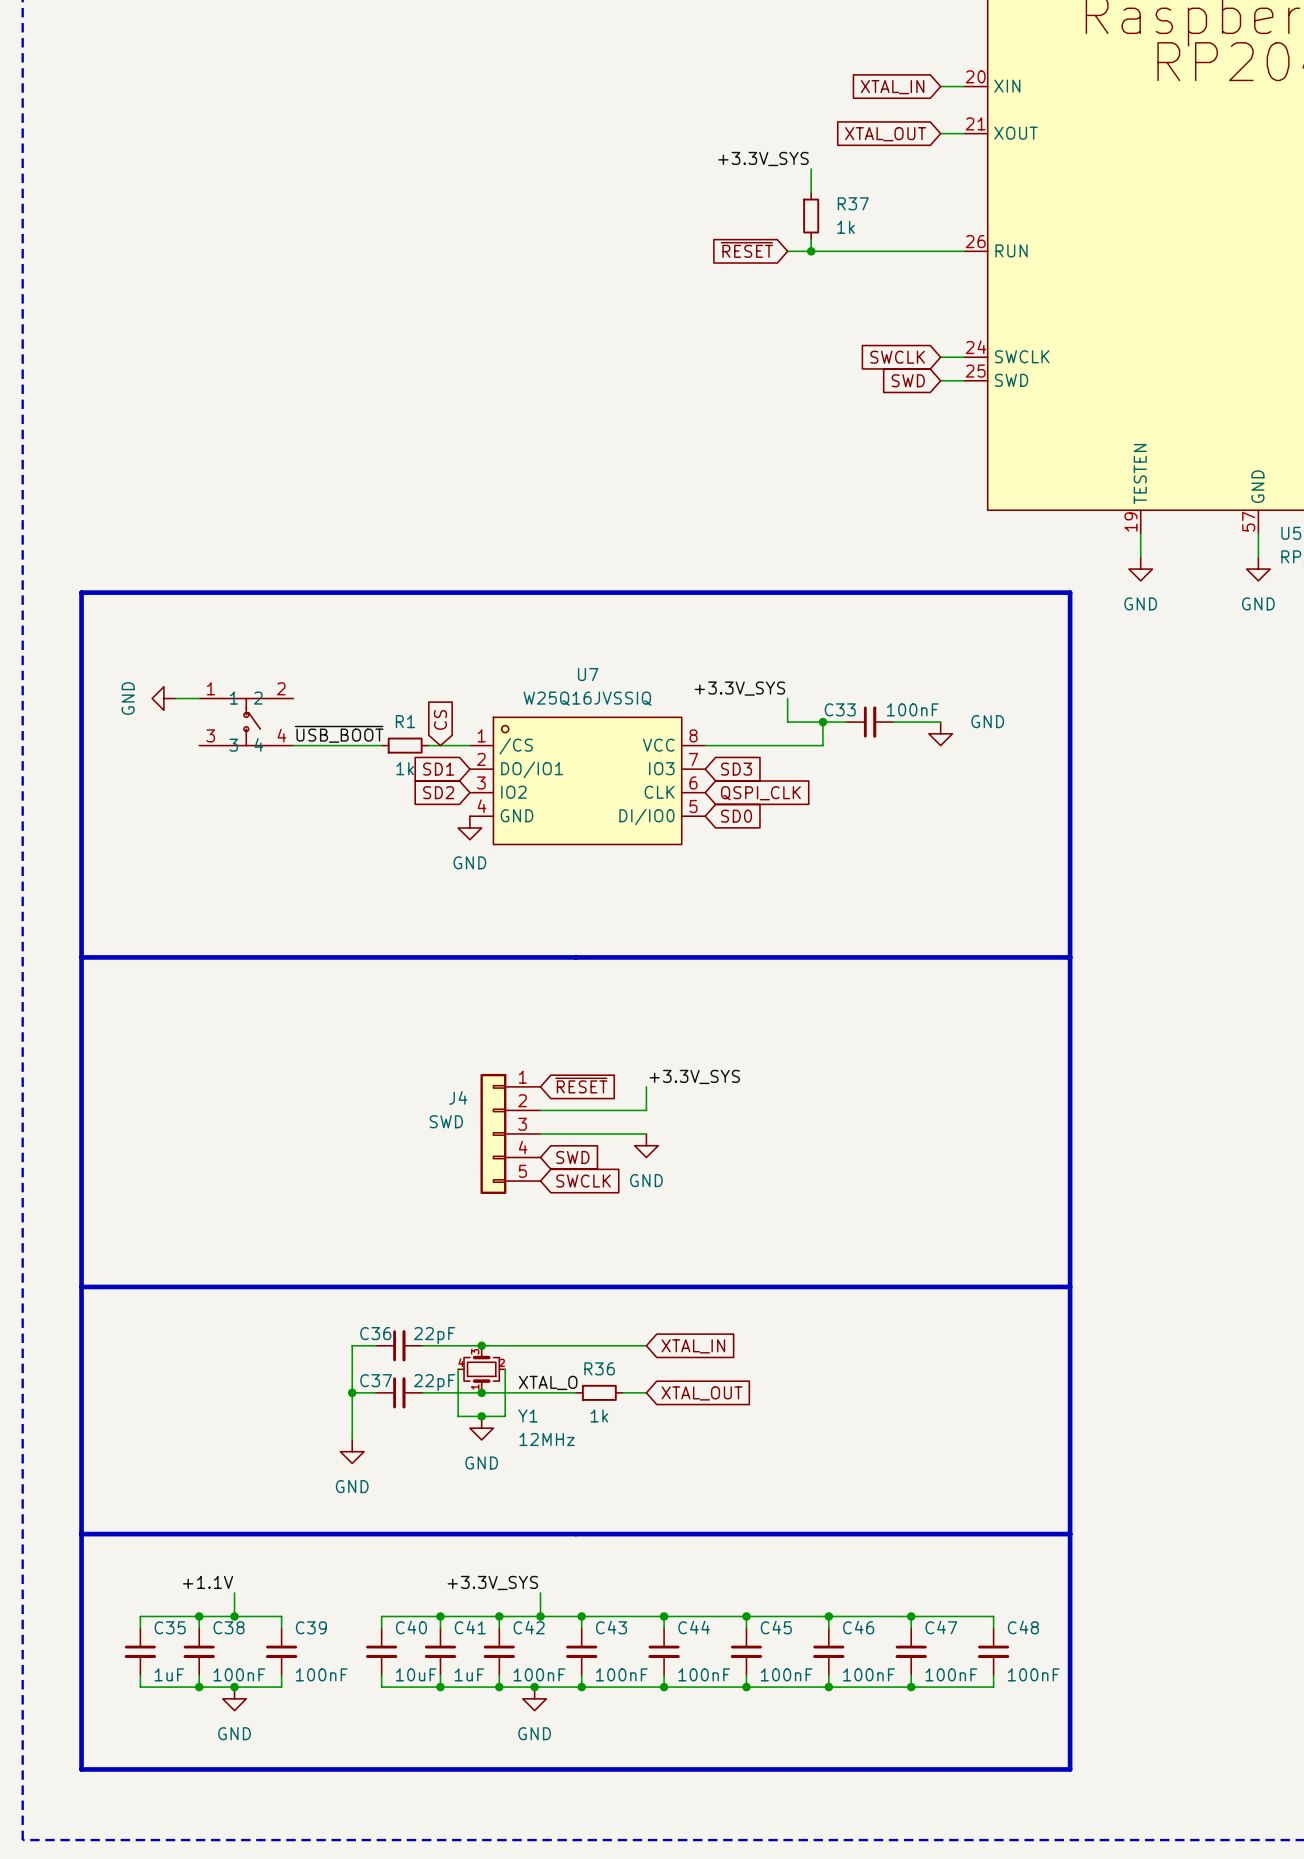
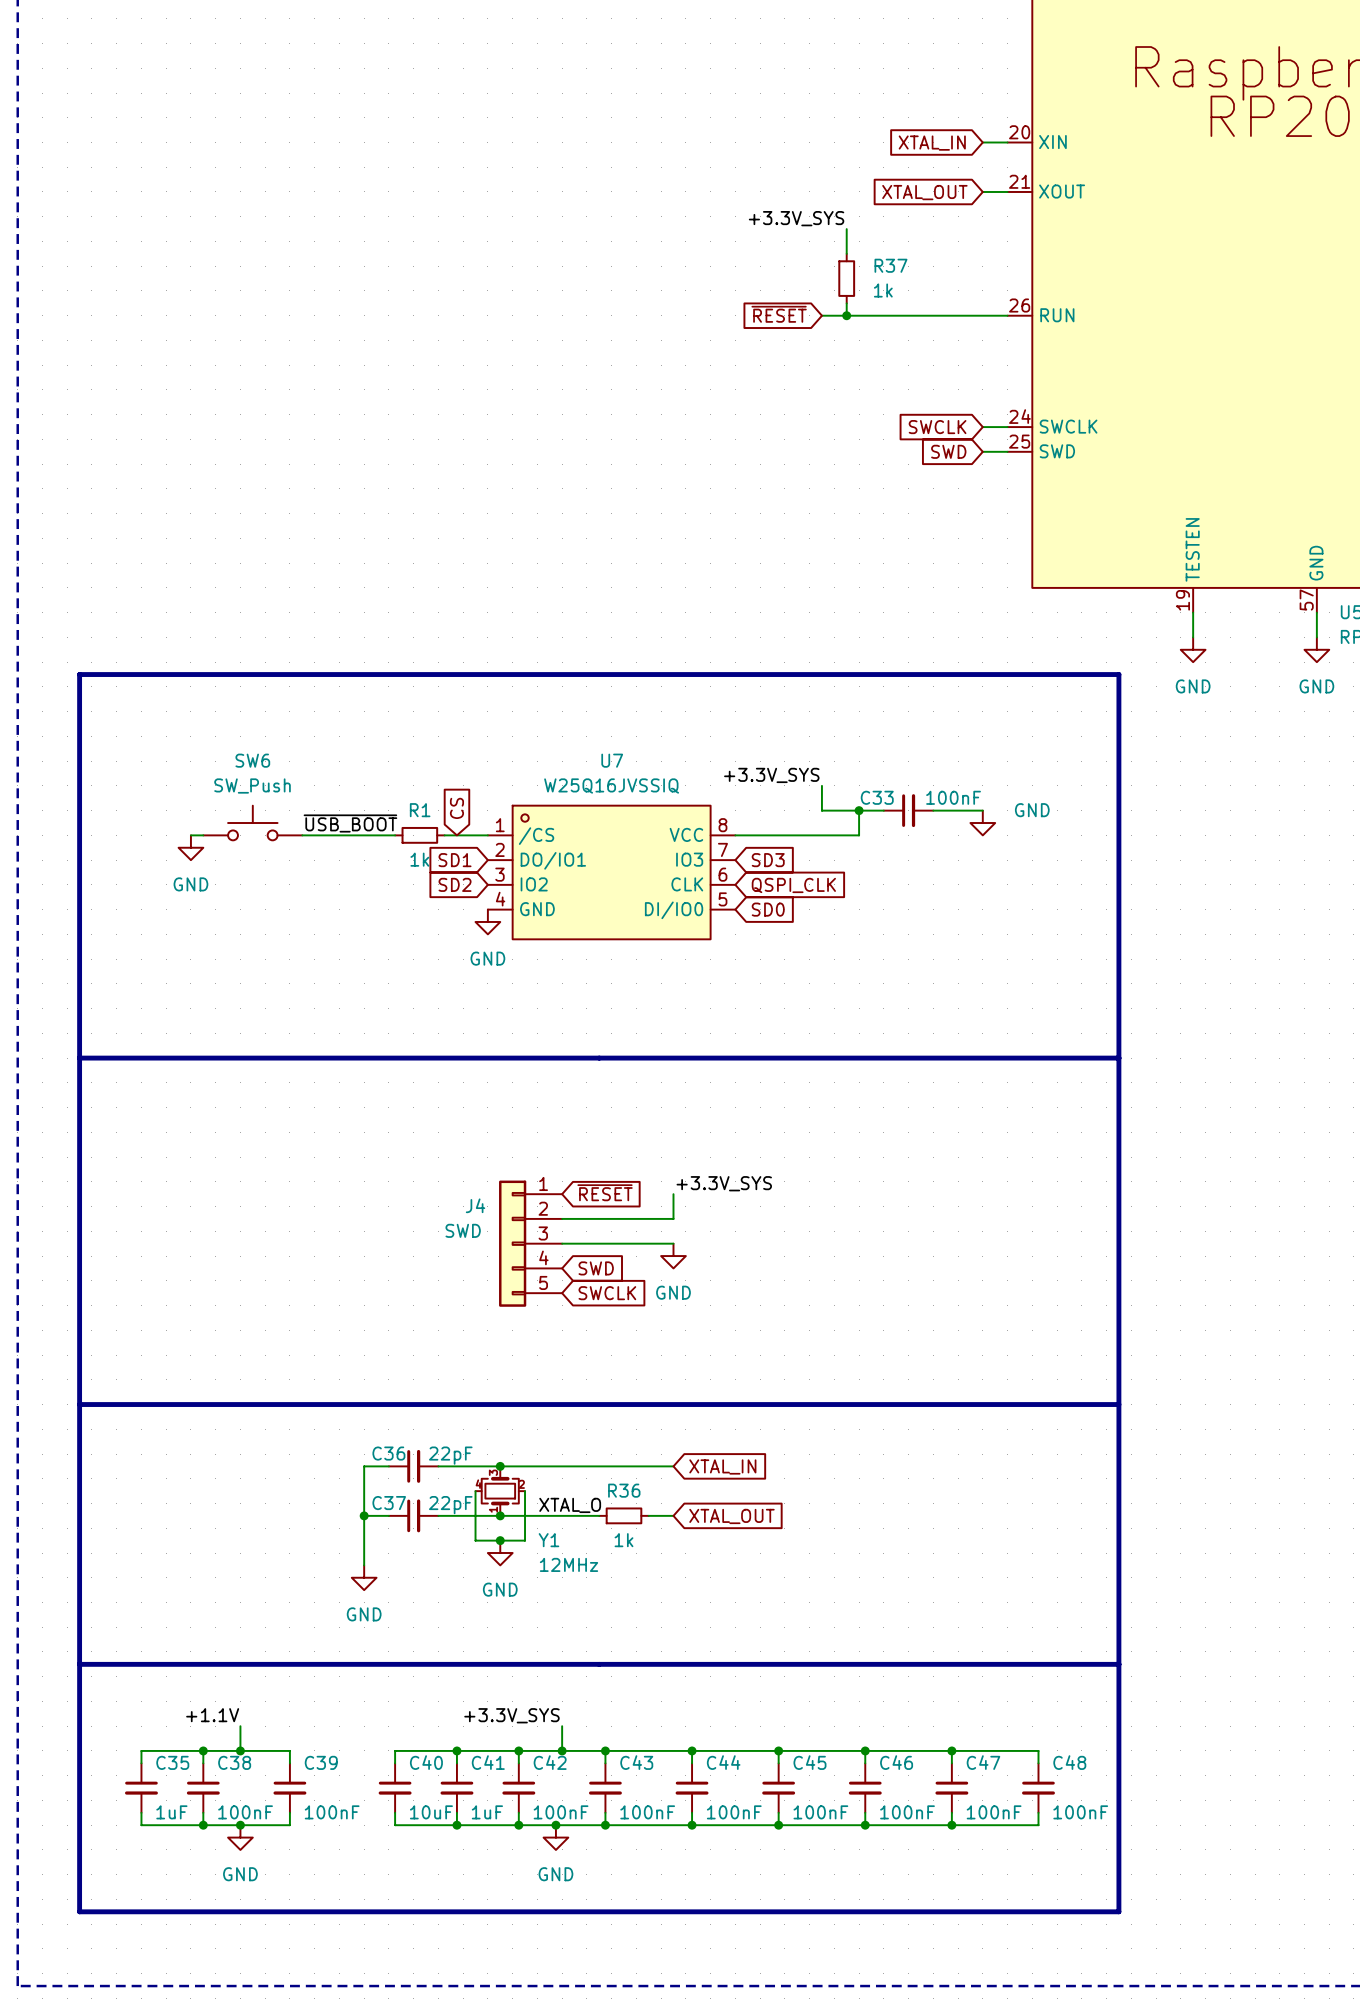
power symbol rotation: 0° (163, 698) -> 90° counterclockwise (190, 847)
power symbol position: GND (163, 698) -> GND (190, 847)
wire: (175, 698) (199, 698) -> none
part: (246, 722) -> none
SW6: none -> SW_Push (252, 823)
wire: none -> (190, 835) (203, 835)

